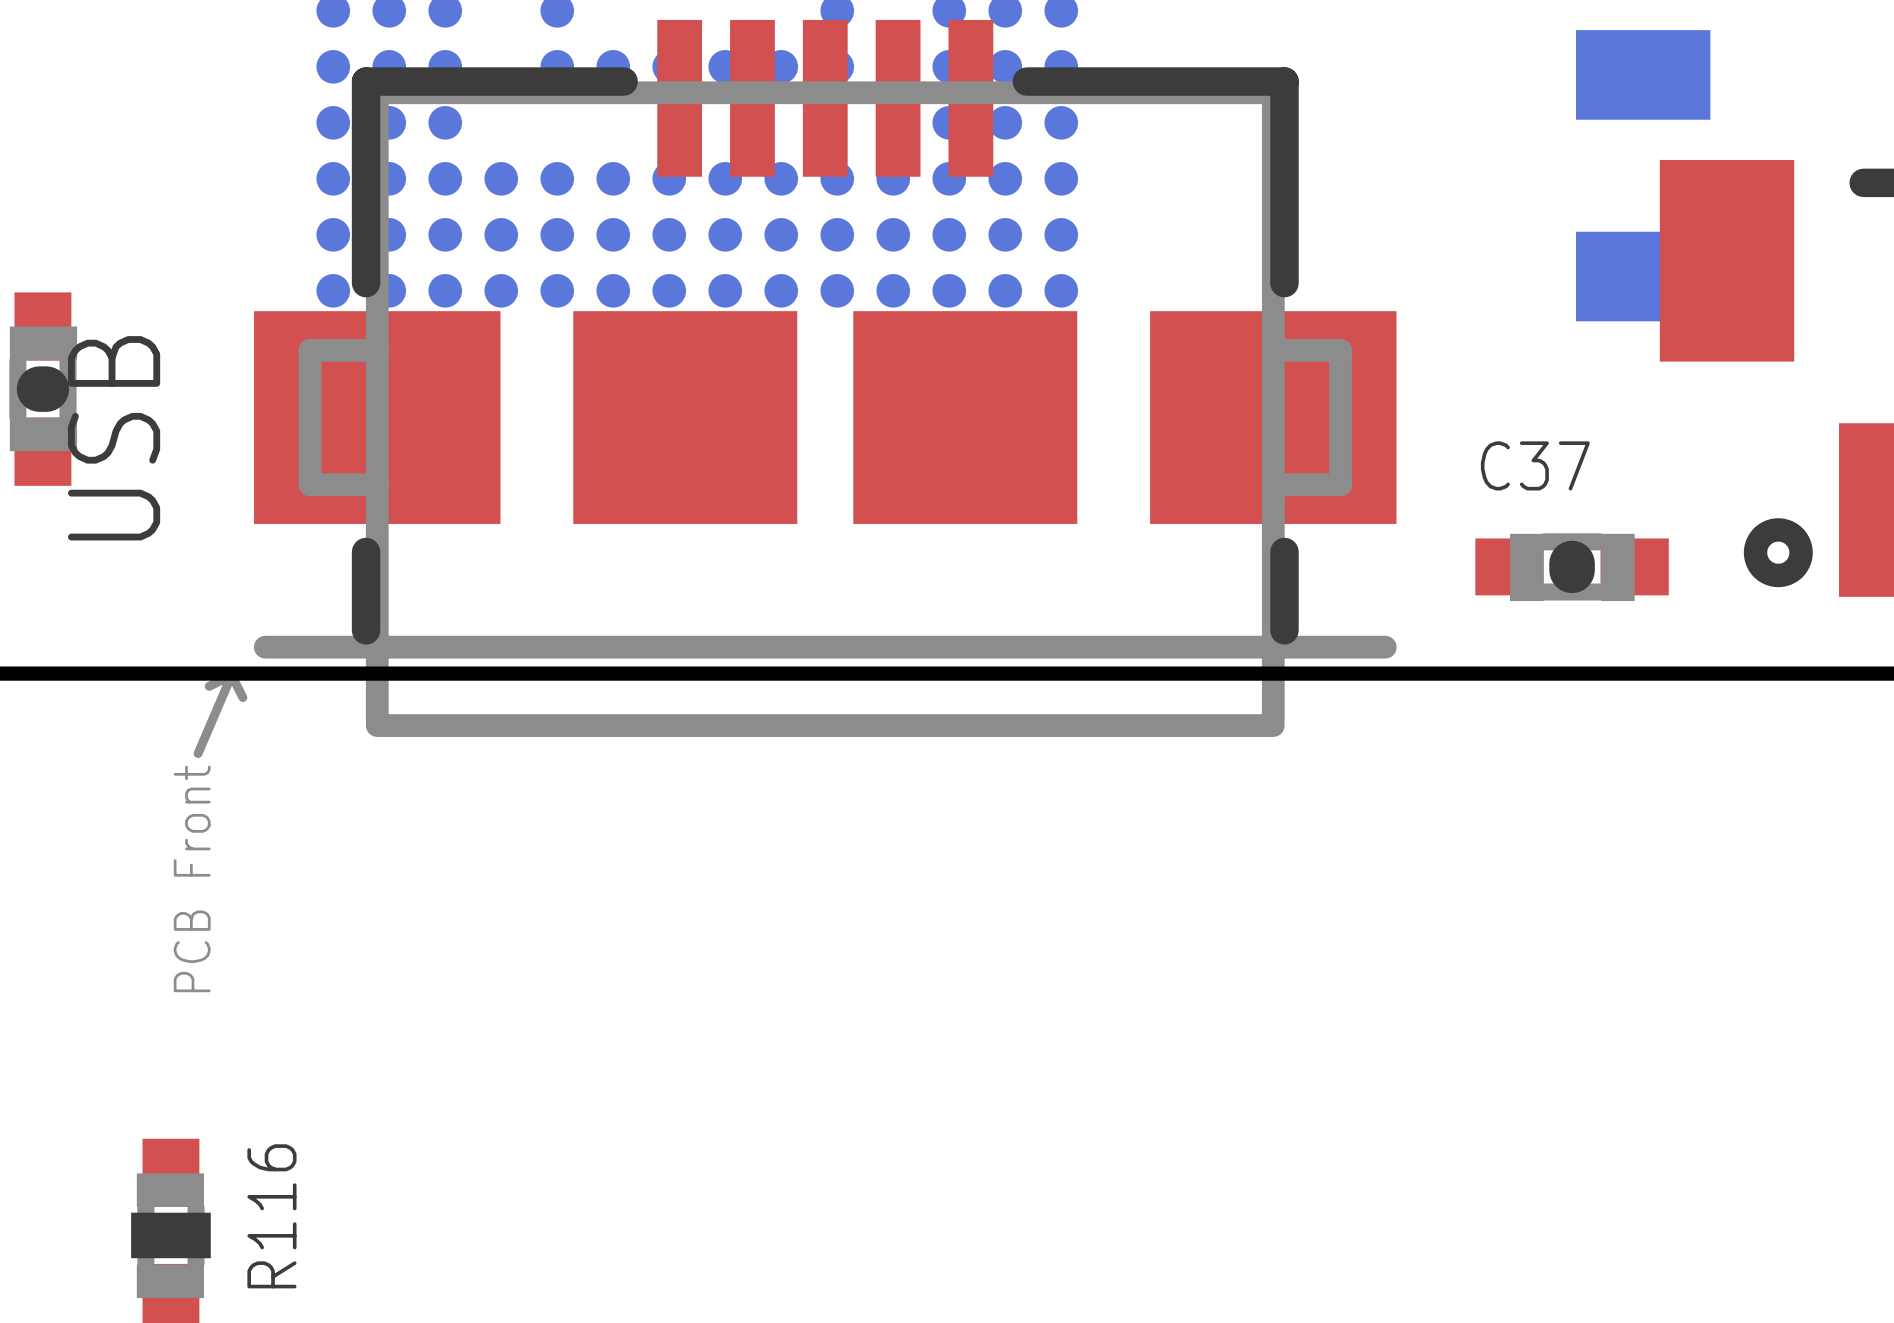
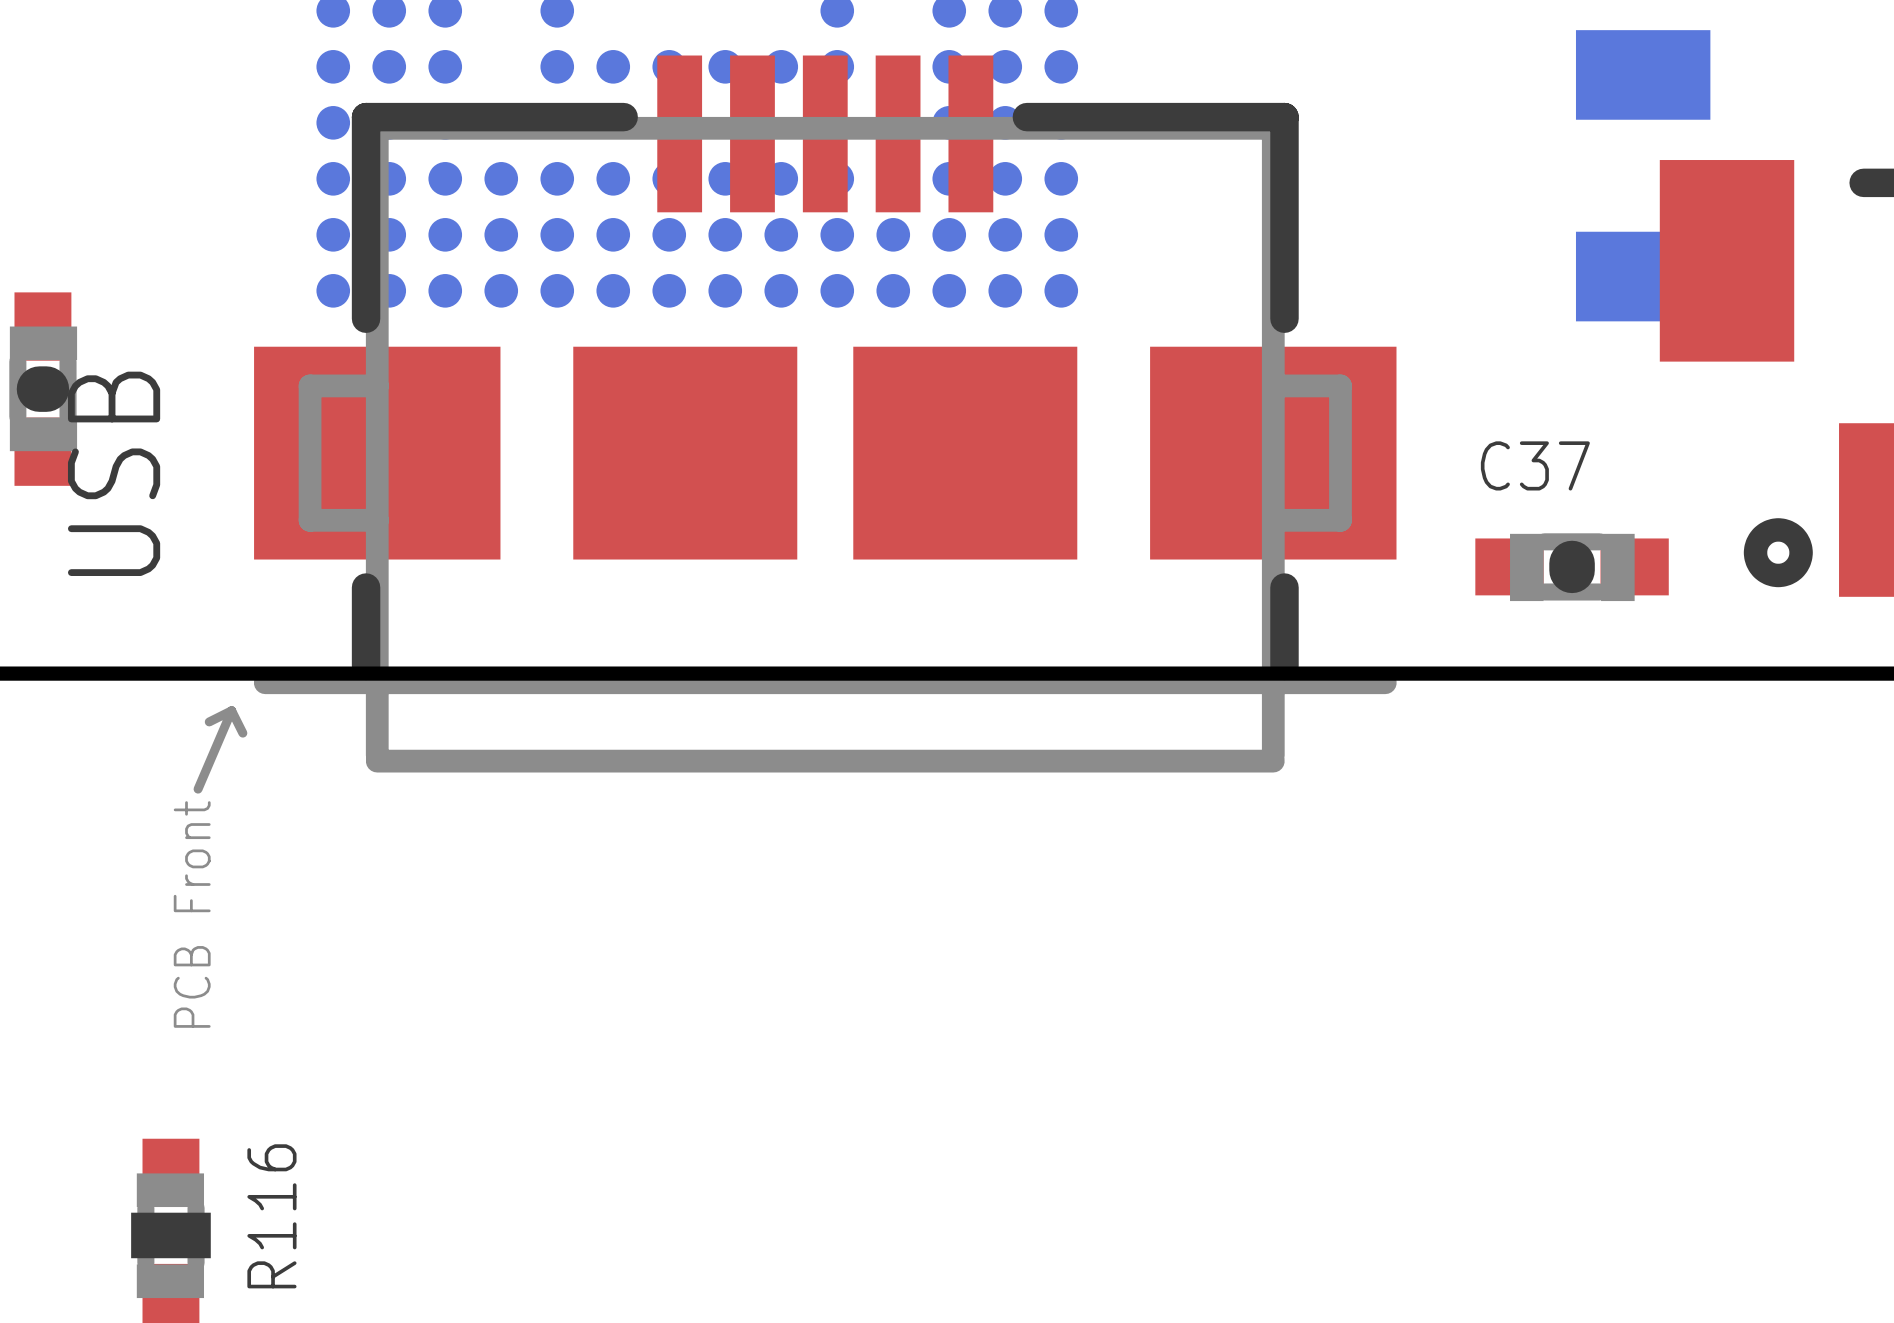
USB position: (795, 389) -> (795, 424)

